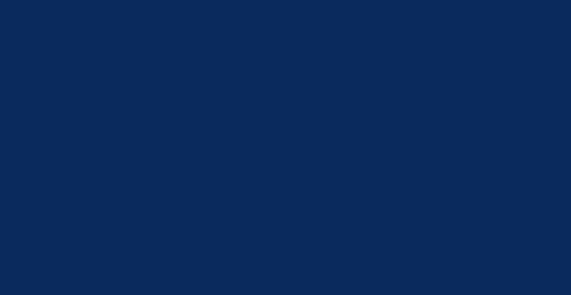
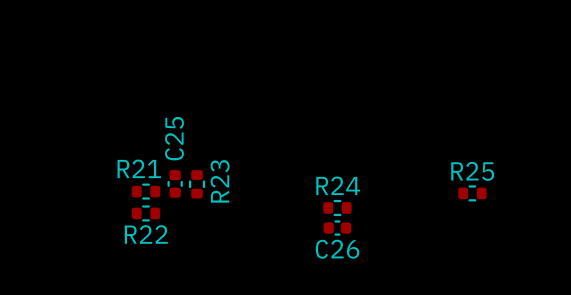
C25: none -> (175, 183)
R23: none -> (197, 184)
R21: none -> (145, 191)
R25: none -> (472, 193)
R24: none -> (337, 207)
R22: none -> (145, 213)
C26: none -> (337, 228)

